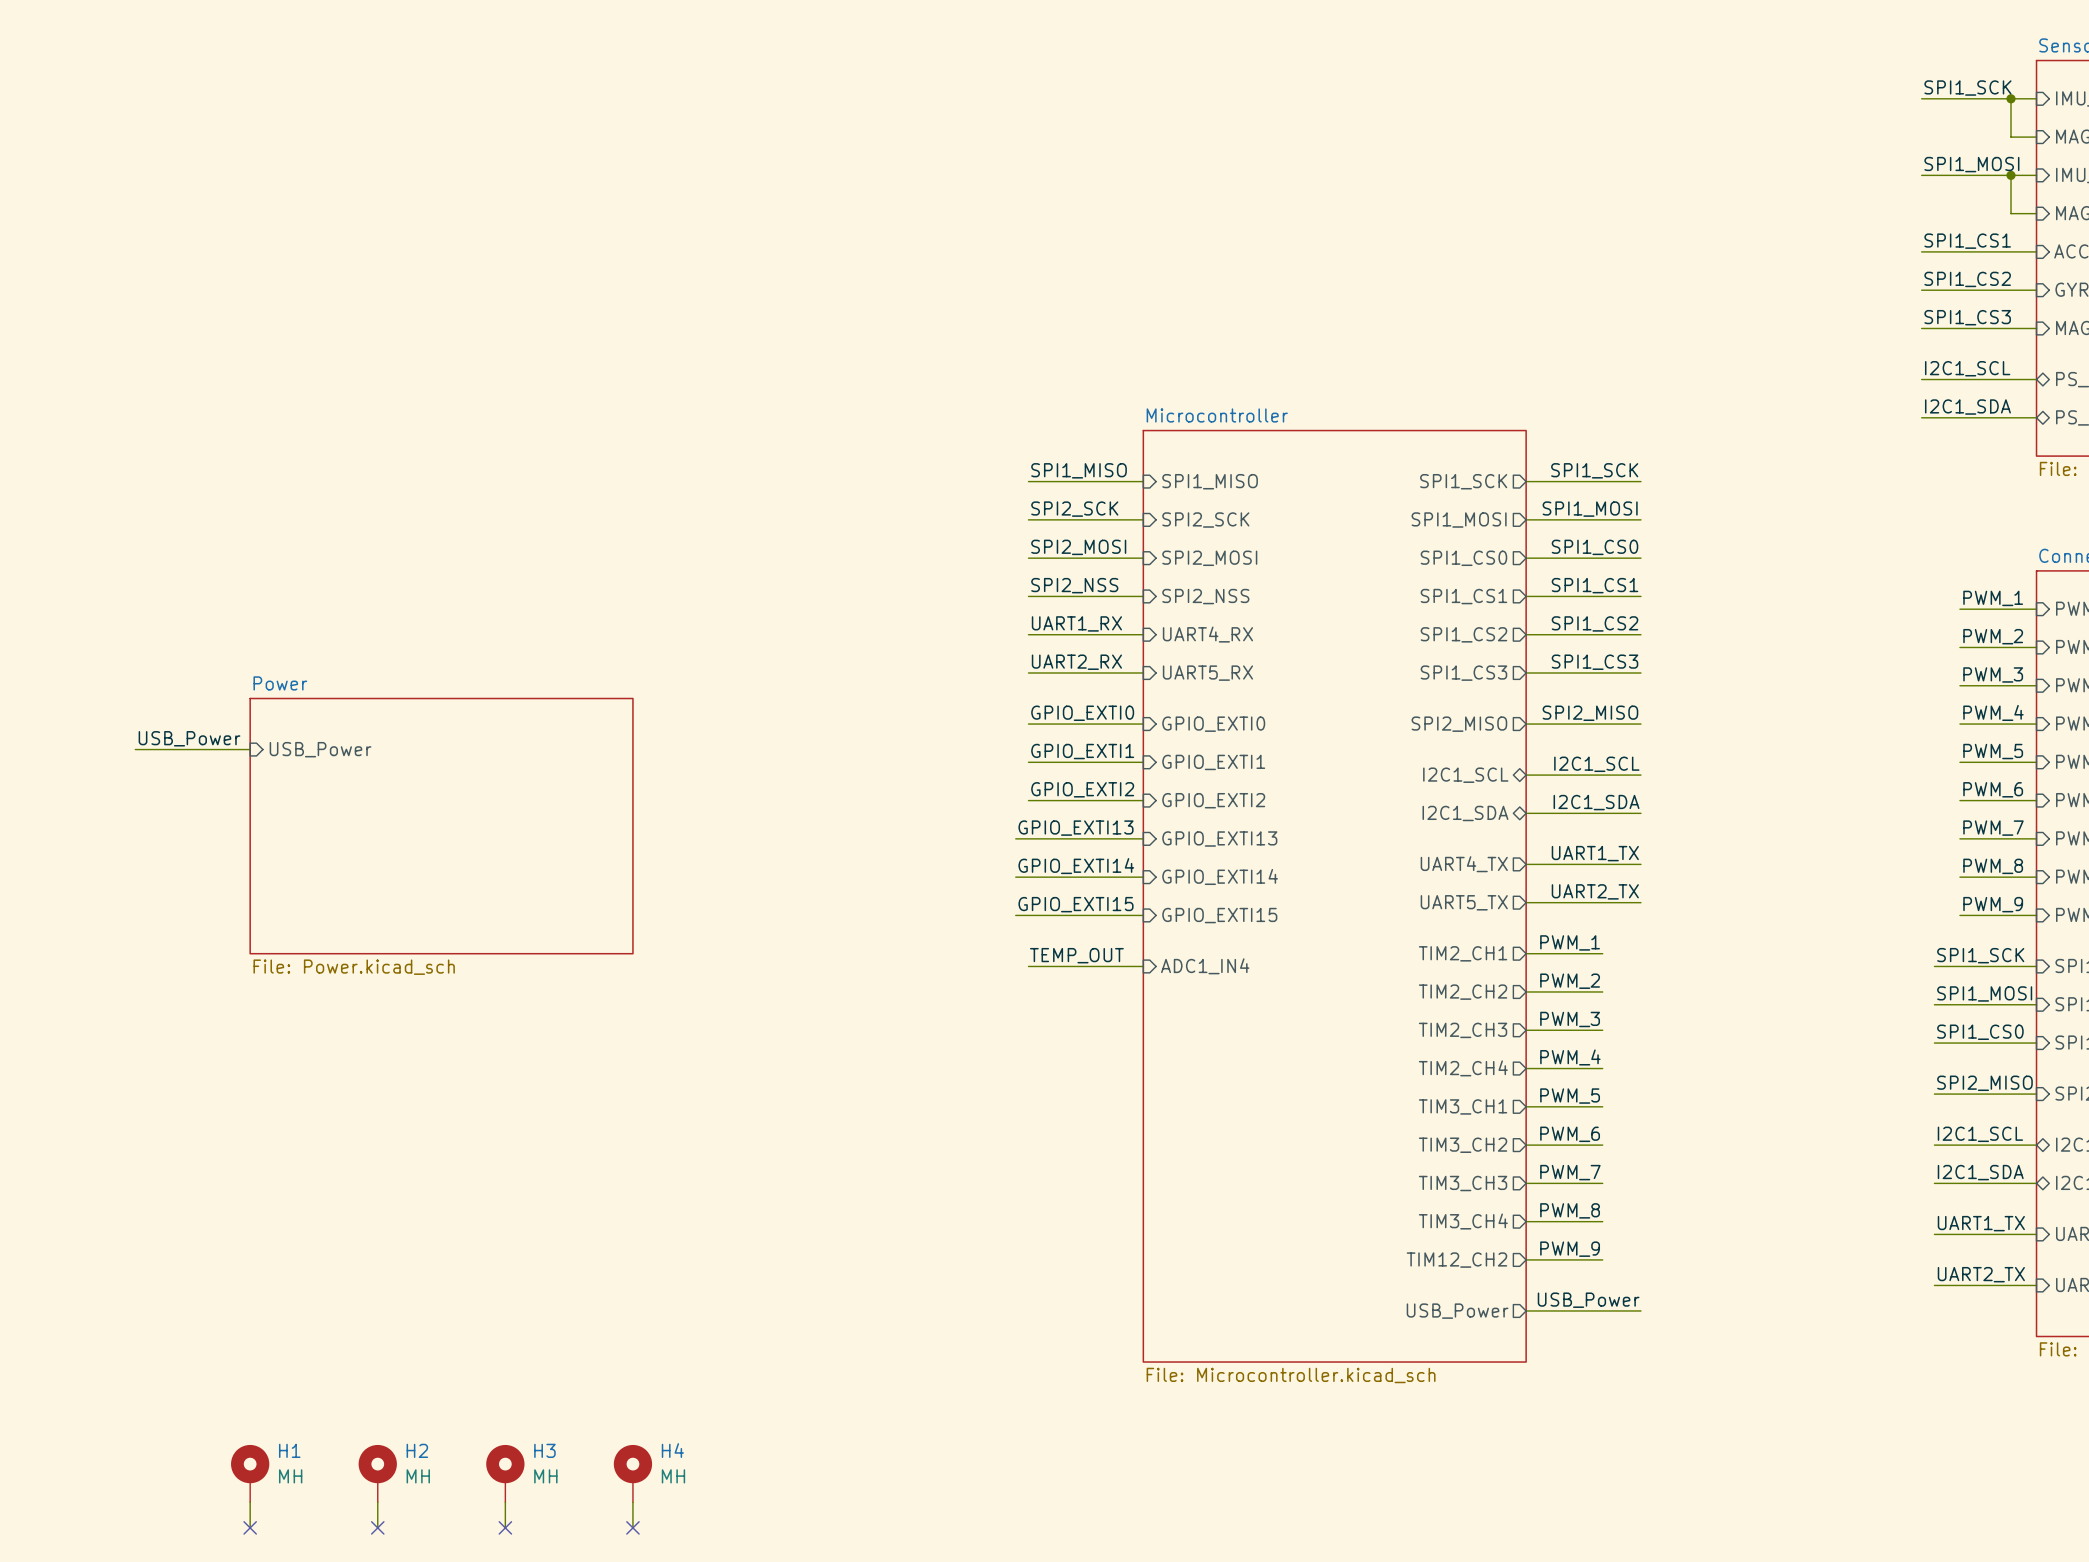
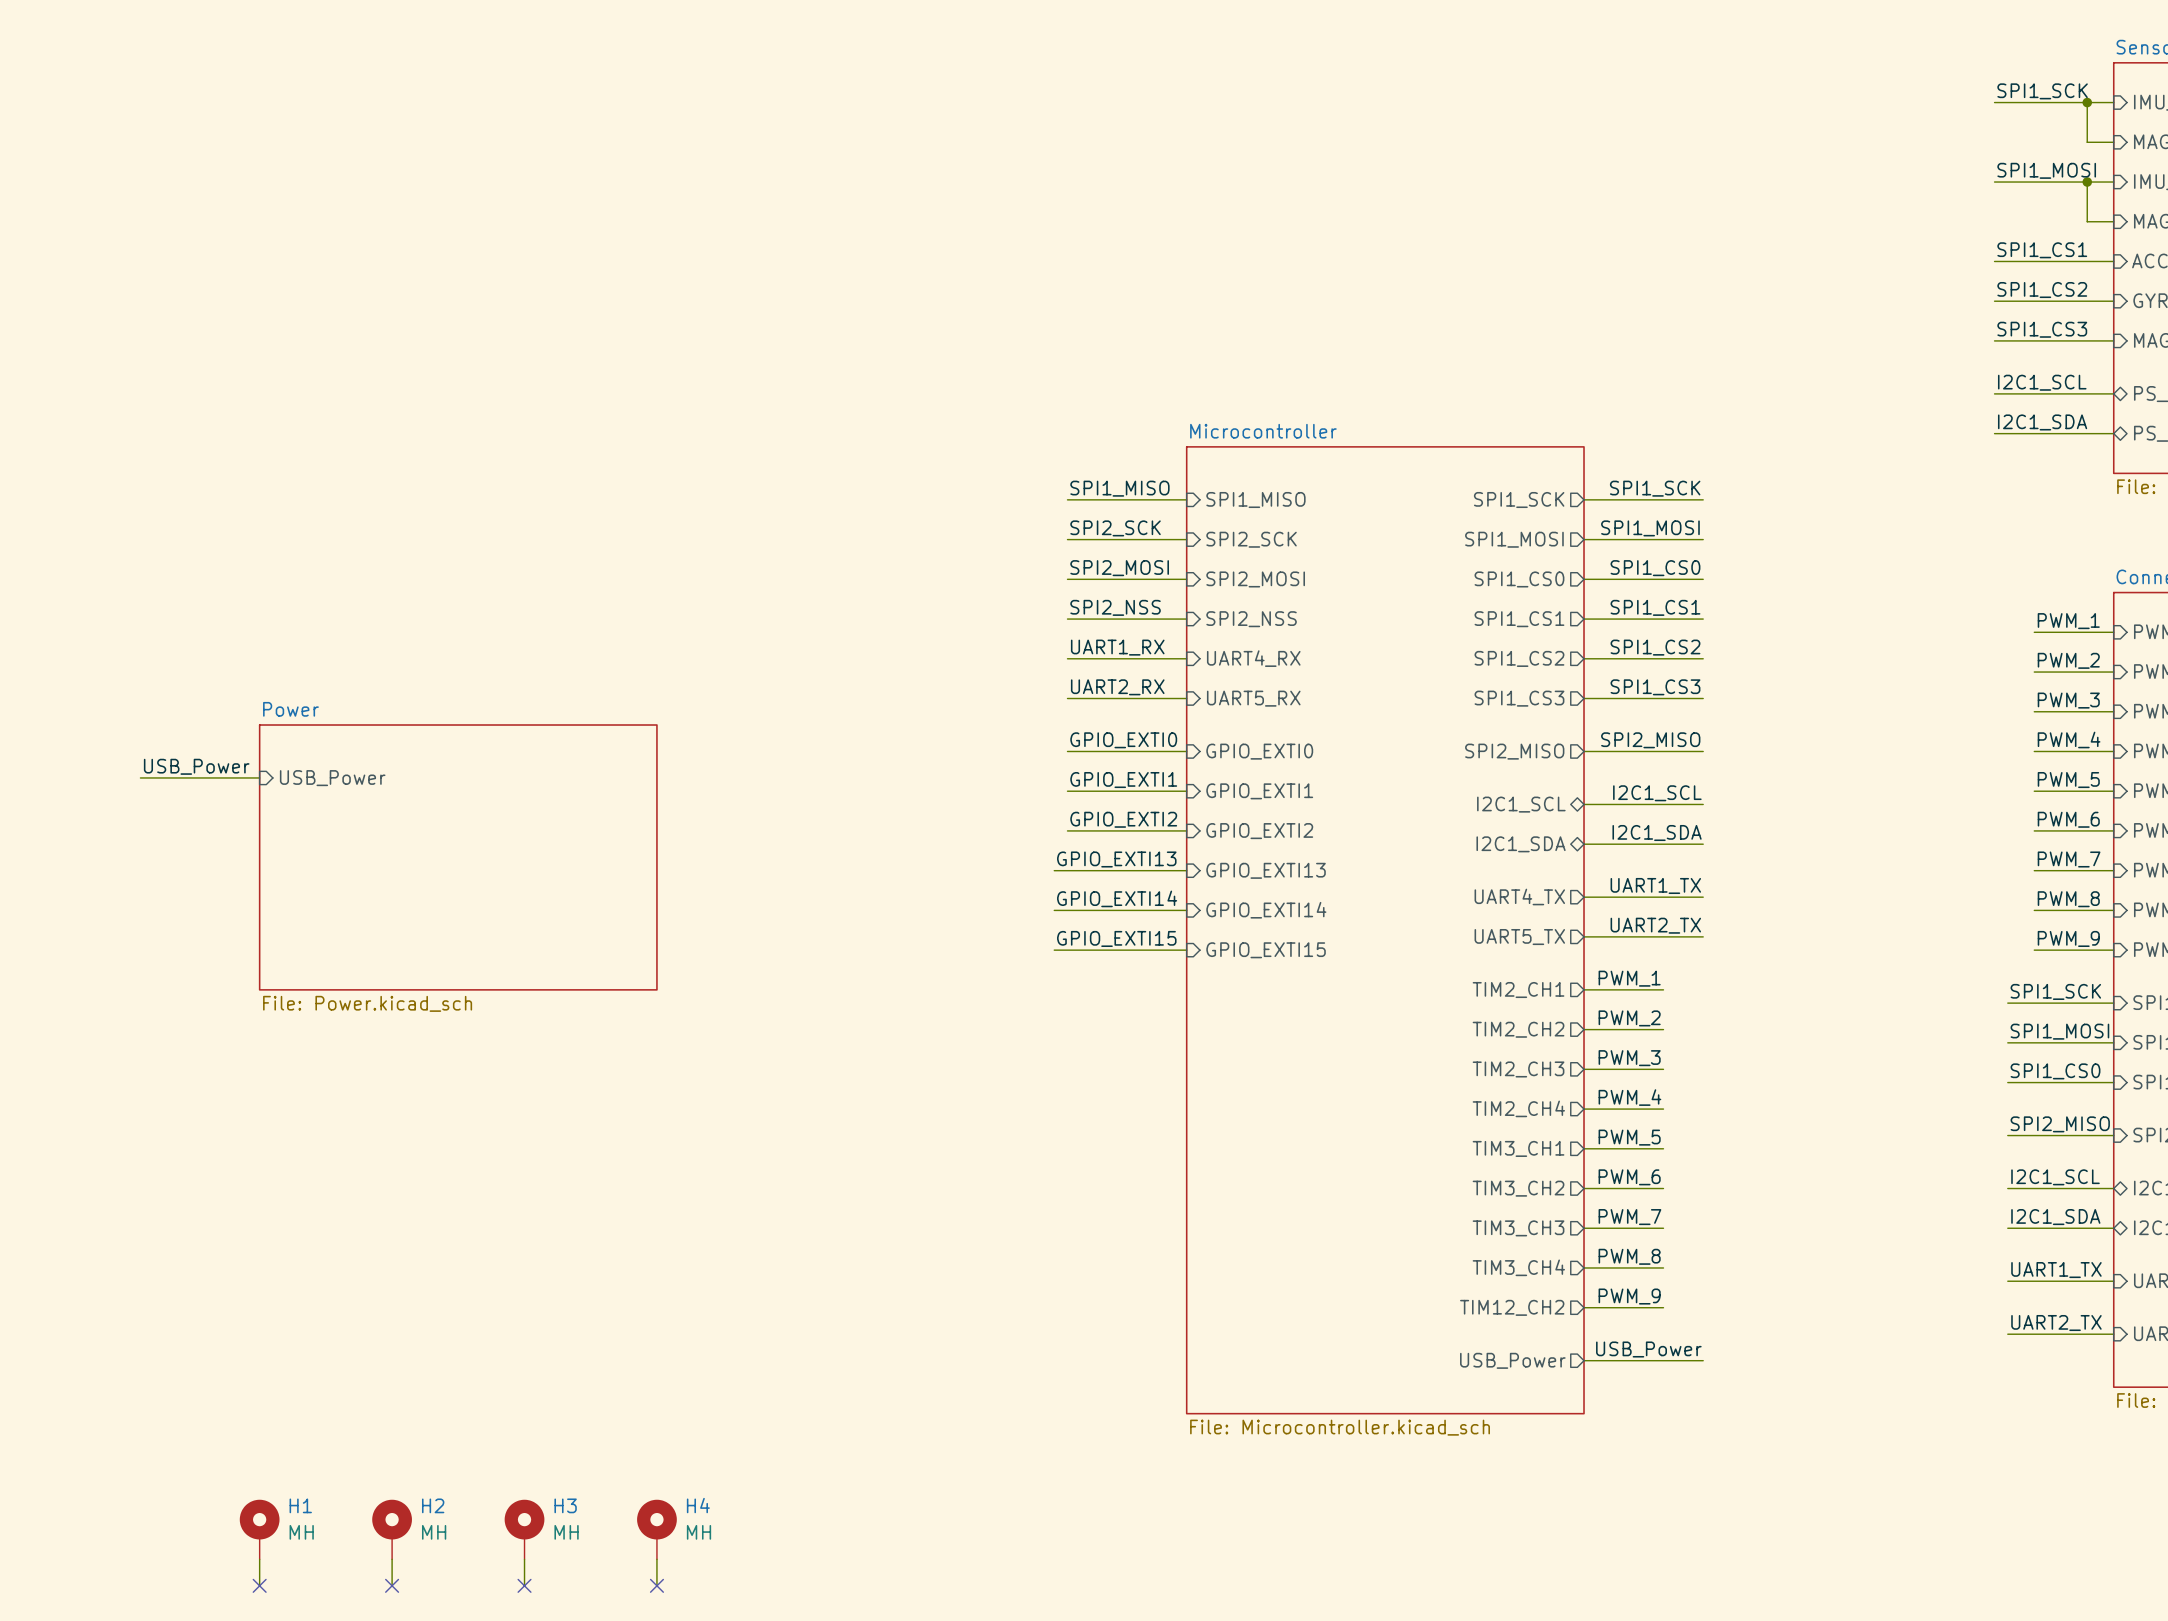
label: TEMP_OUT (1076, 955) -> none
wire: (1028, 966) (1143, 966) -> none
sheet pin: ADC1_IN4 (1205, 966) -> none

